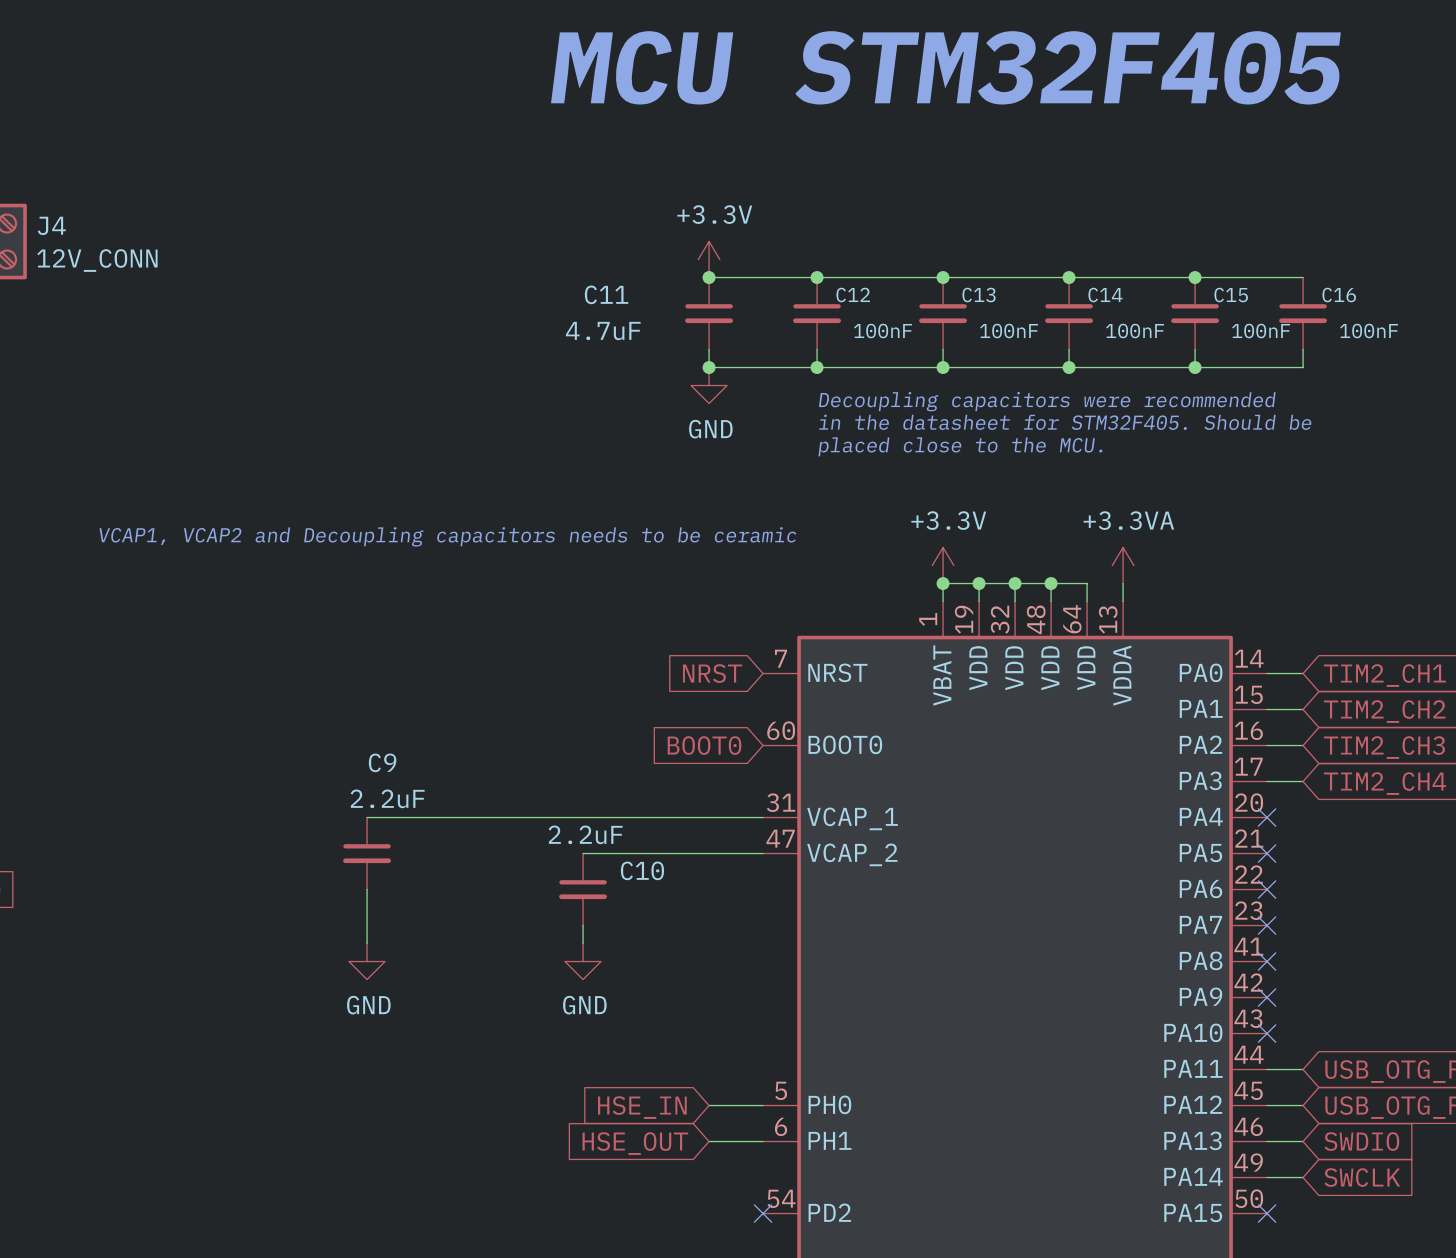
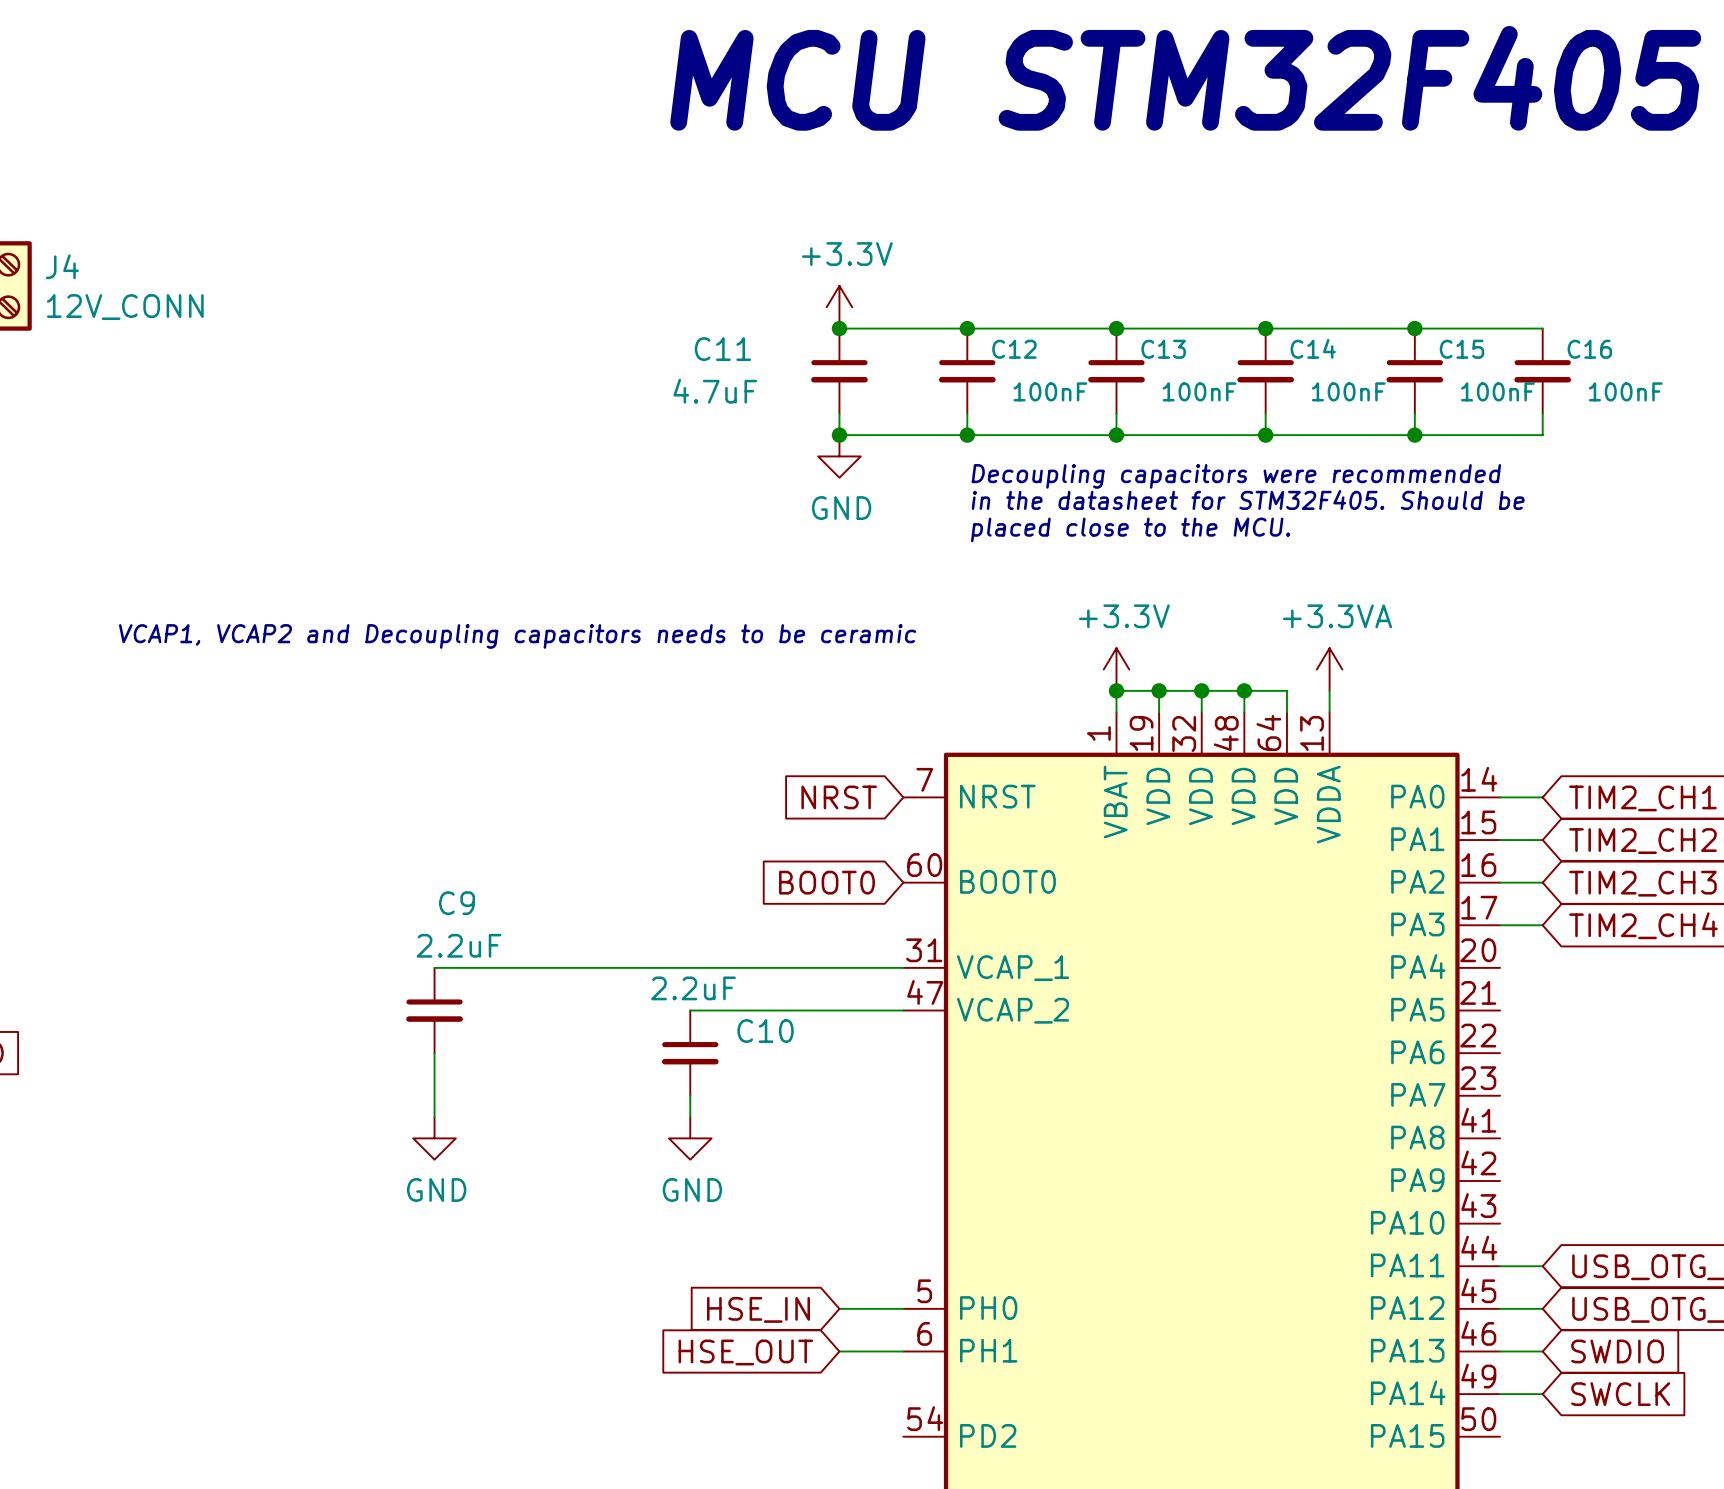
no-connect mark: (1267, 817) -> none
no-connect mark: (1267, 853) -> none
no-connect mark: (1267, 889) -> none
no-connect mark: (1267, 925) -> none
no-connect mark: (1267, 961) -> none
no-connect mark: (1267, 997) -> none
no-connect mark: (1267, 1033) -> none
no-connect mark: (763, 1213) -> none
no-connect mark: (1267, 1213) -> none

